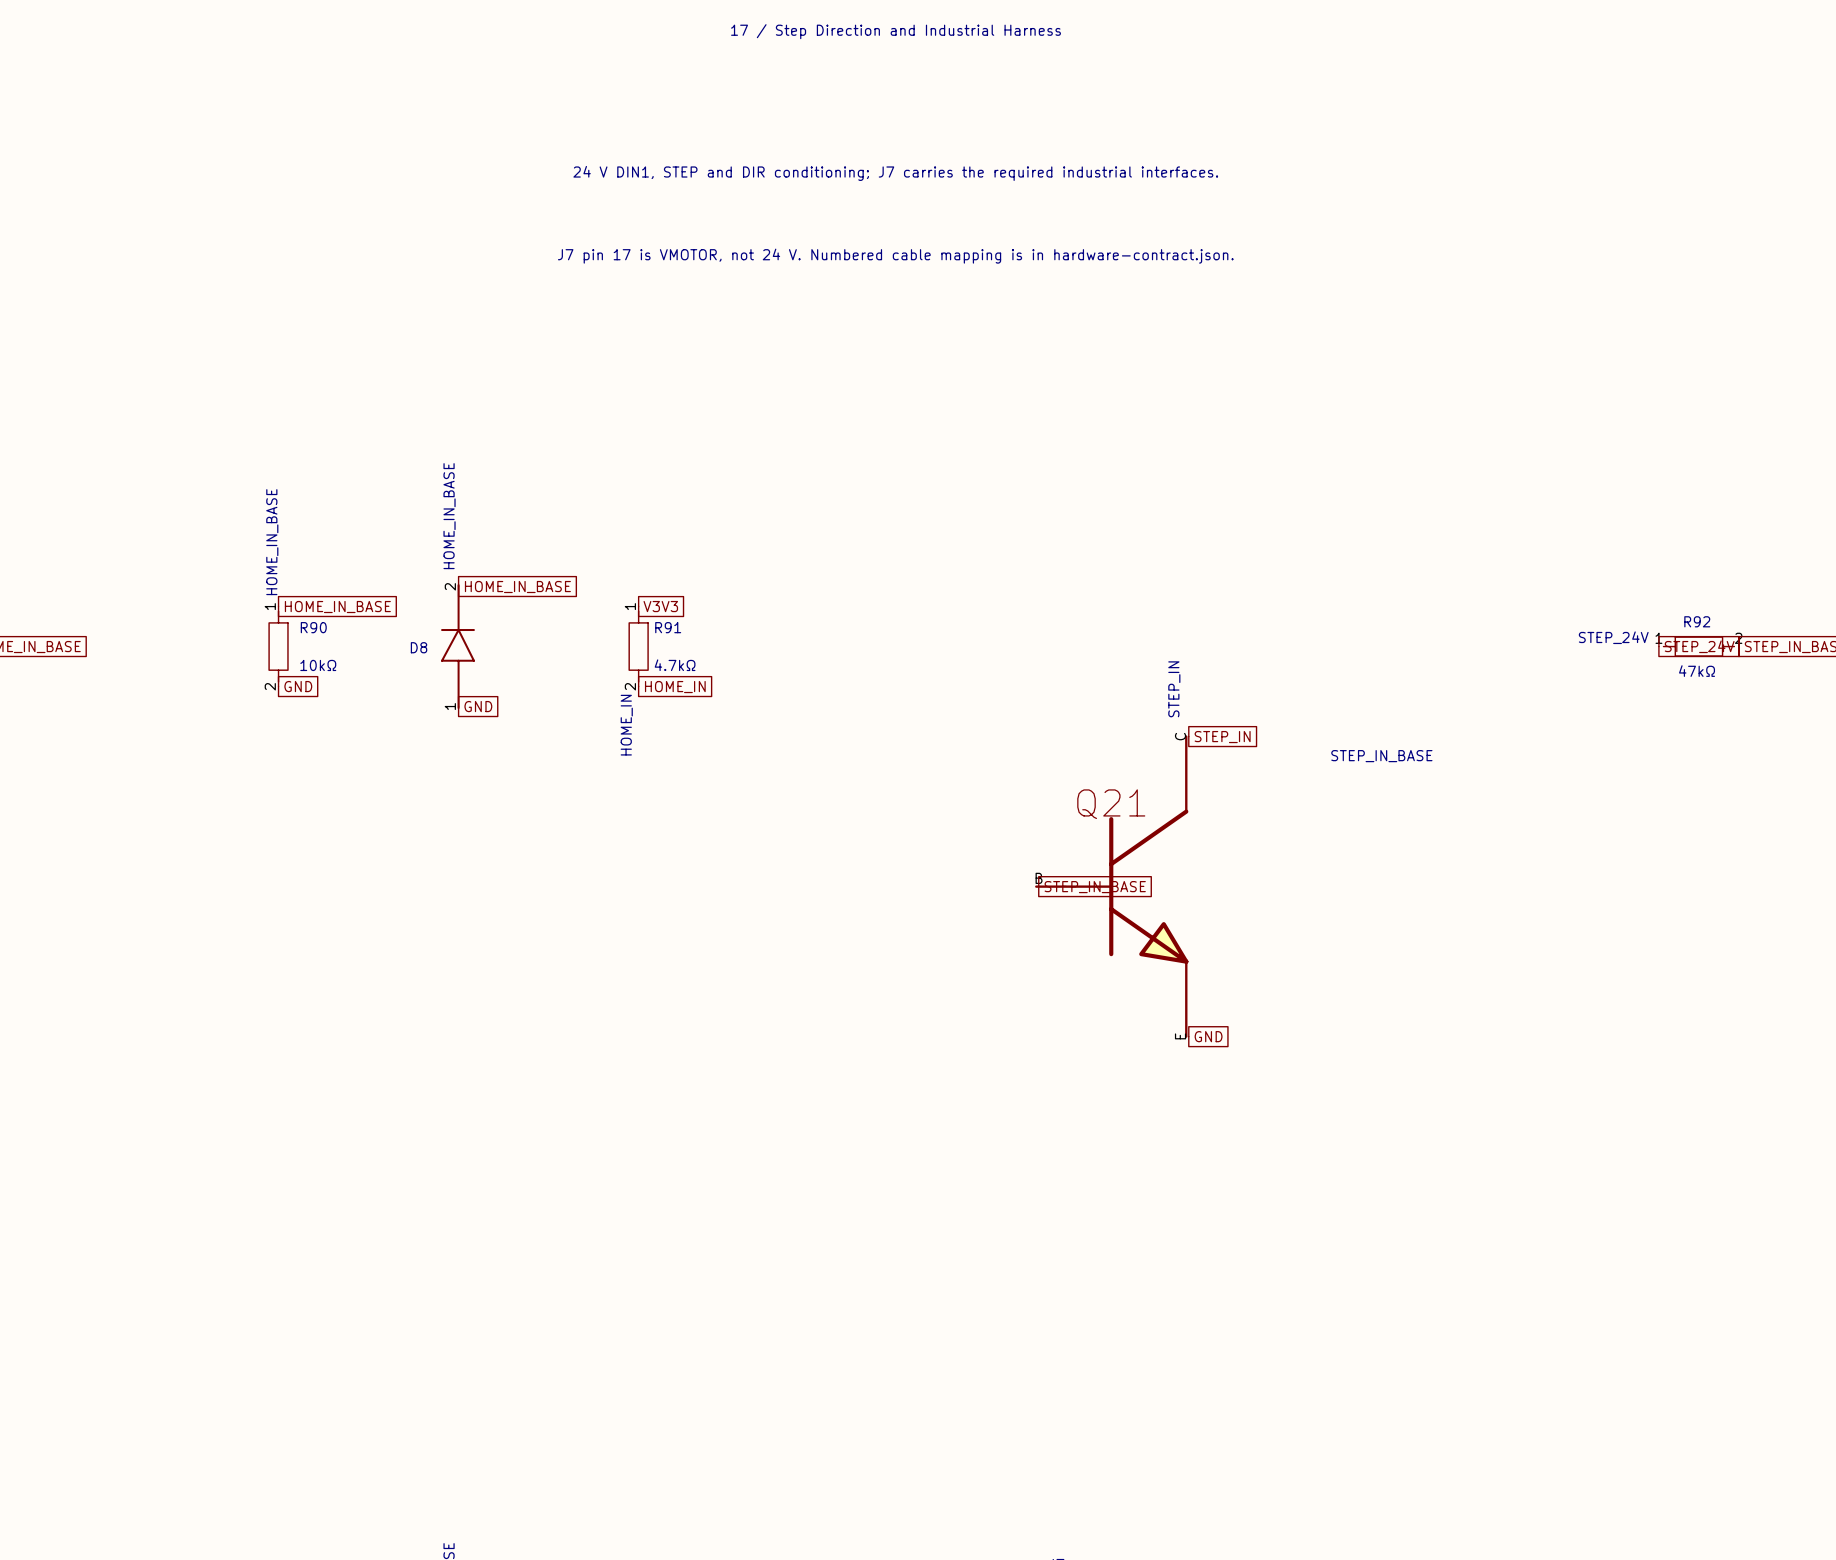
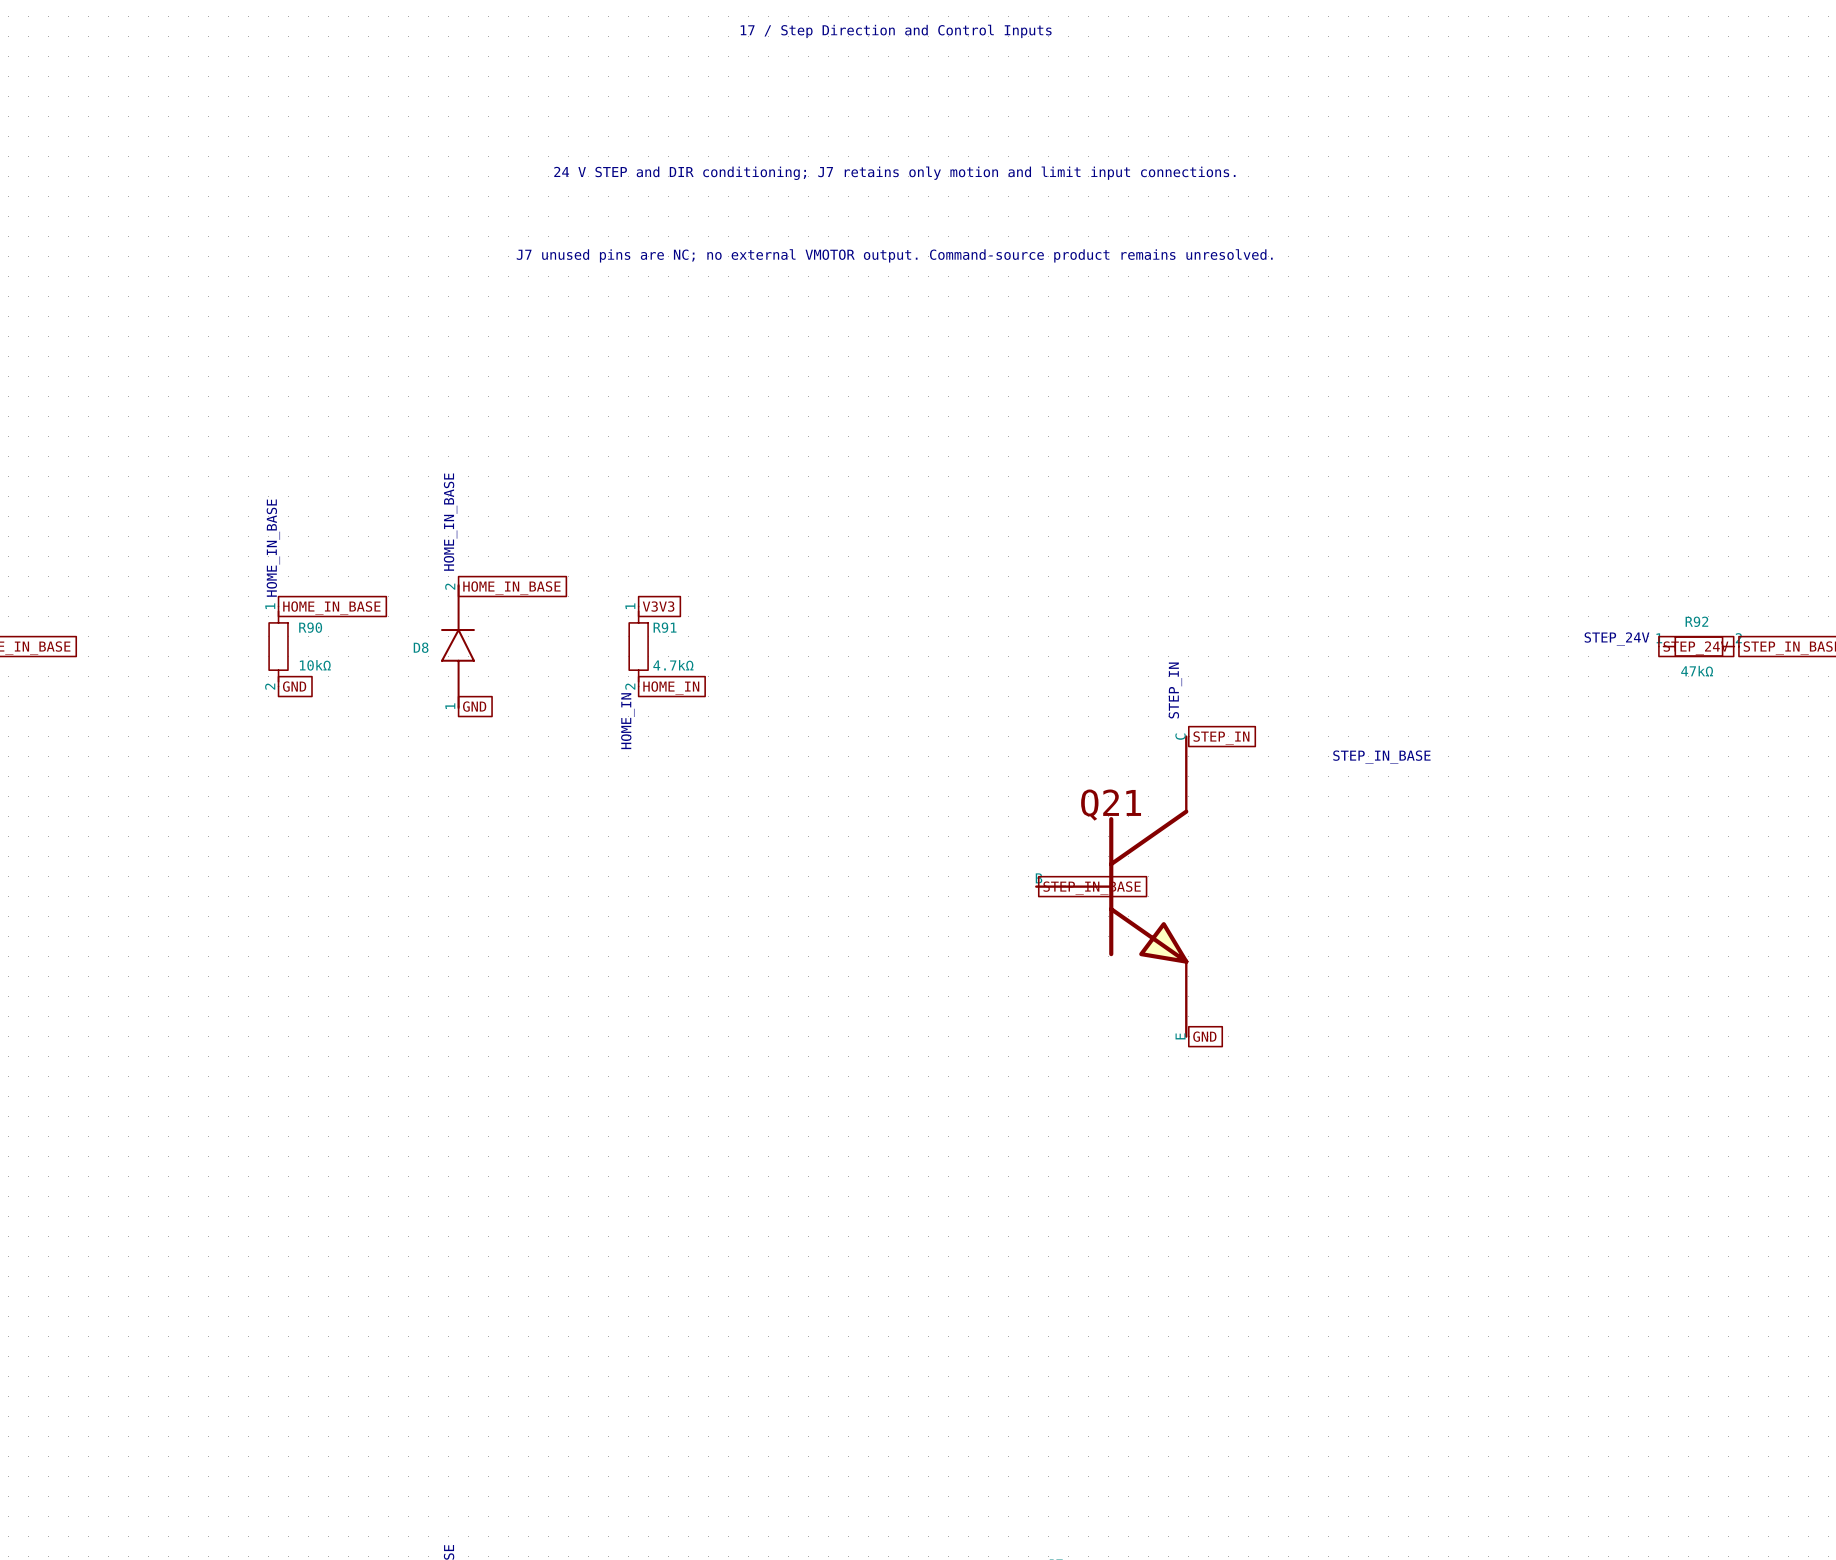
text: 17 / Step Direction and Industrial Harness (896, 31) -> 17 / Step Direction and Control Inputs (896, 31)
text: 24 V DIN1, STEP and DIR conditioning; J7 carries the required industrial interfaces. (895, 173) -> 24 V STEP and DIR conditioning; J7 retains only motion and limit input connections. (894, 173)
text: J7 pin 17 is VMOTOR, not 24 V. Numbered cable mapping is in hardware-contract.json. (895, 256) -> J7 unused pins are NC; no external VMOTOR output. Command-source product remains unresolved. (894, 255)

